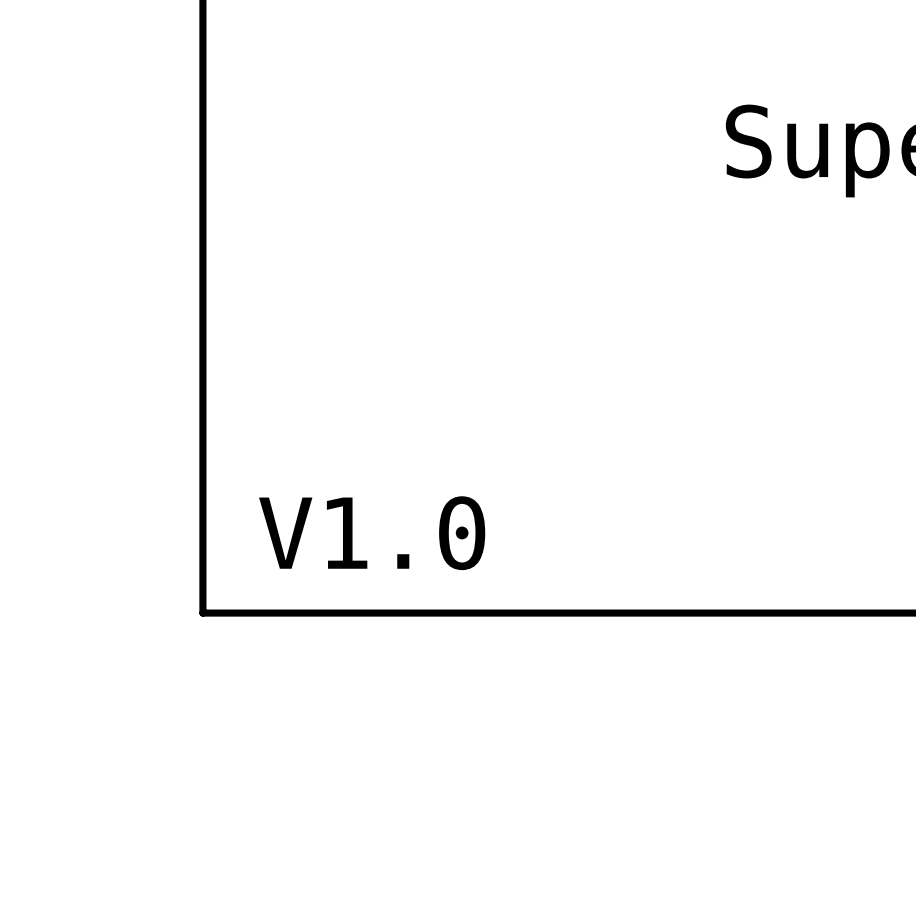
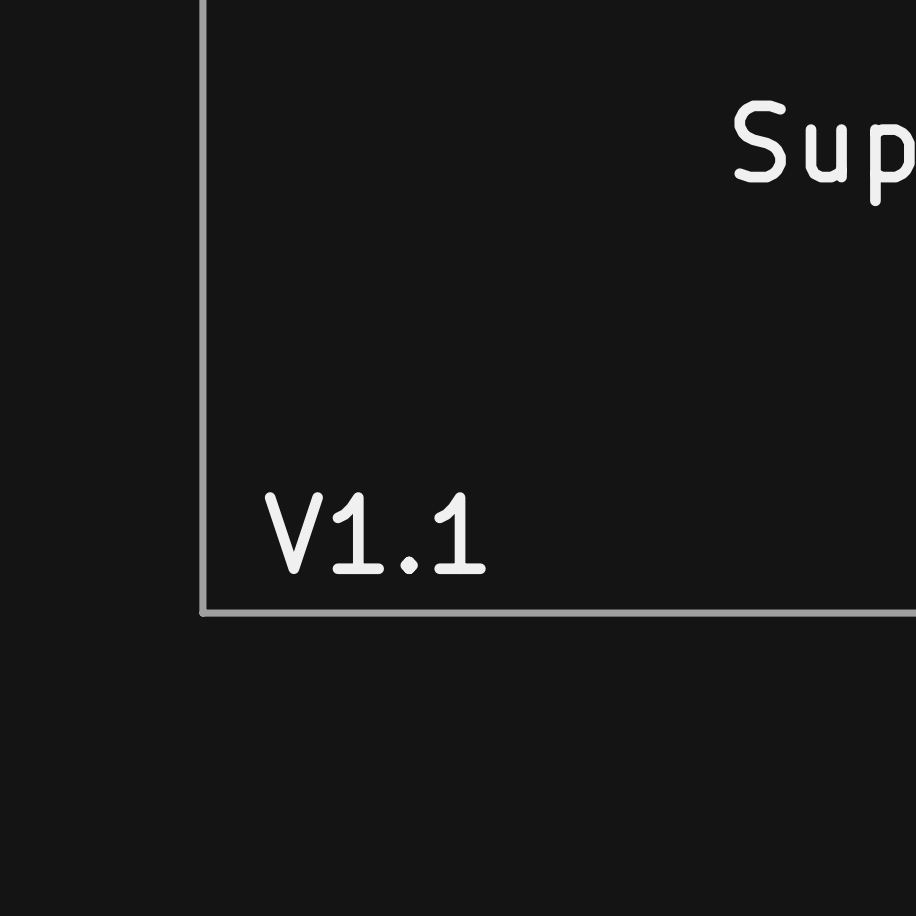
text: V1.0 (372, 533) -> V1.1 (375, 533)

